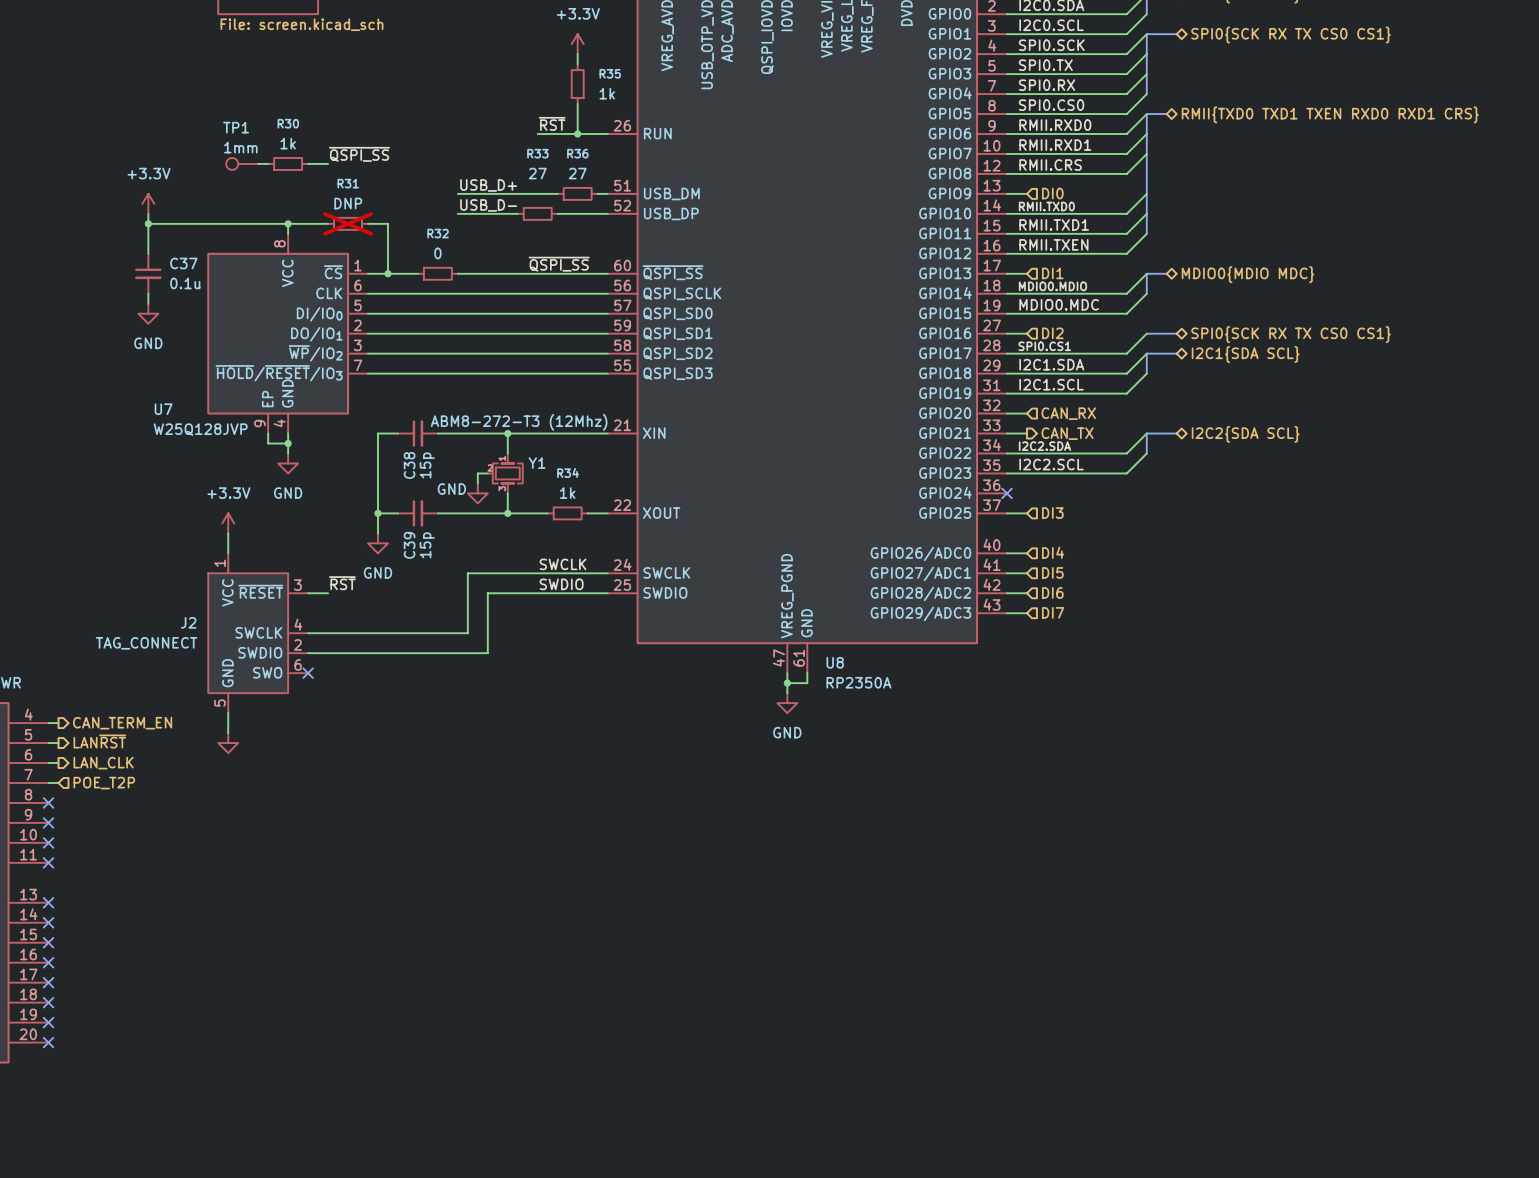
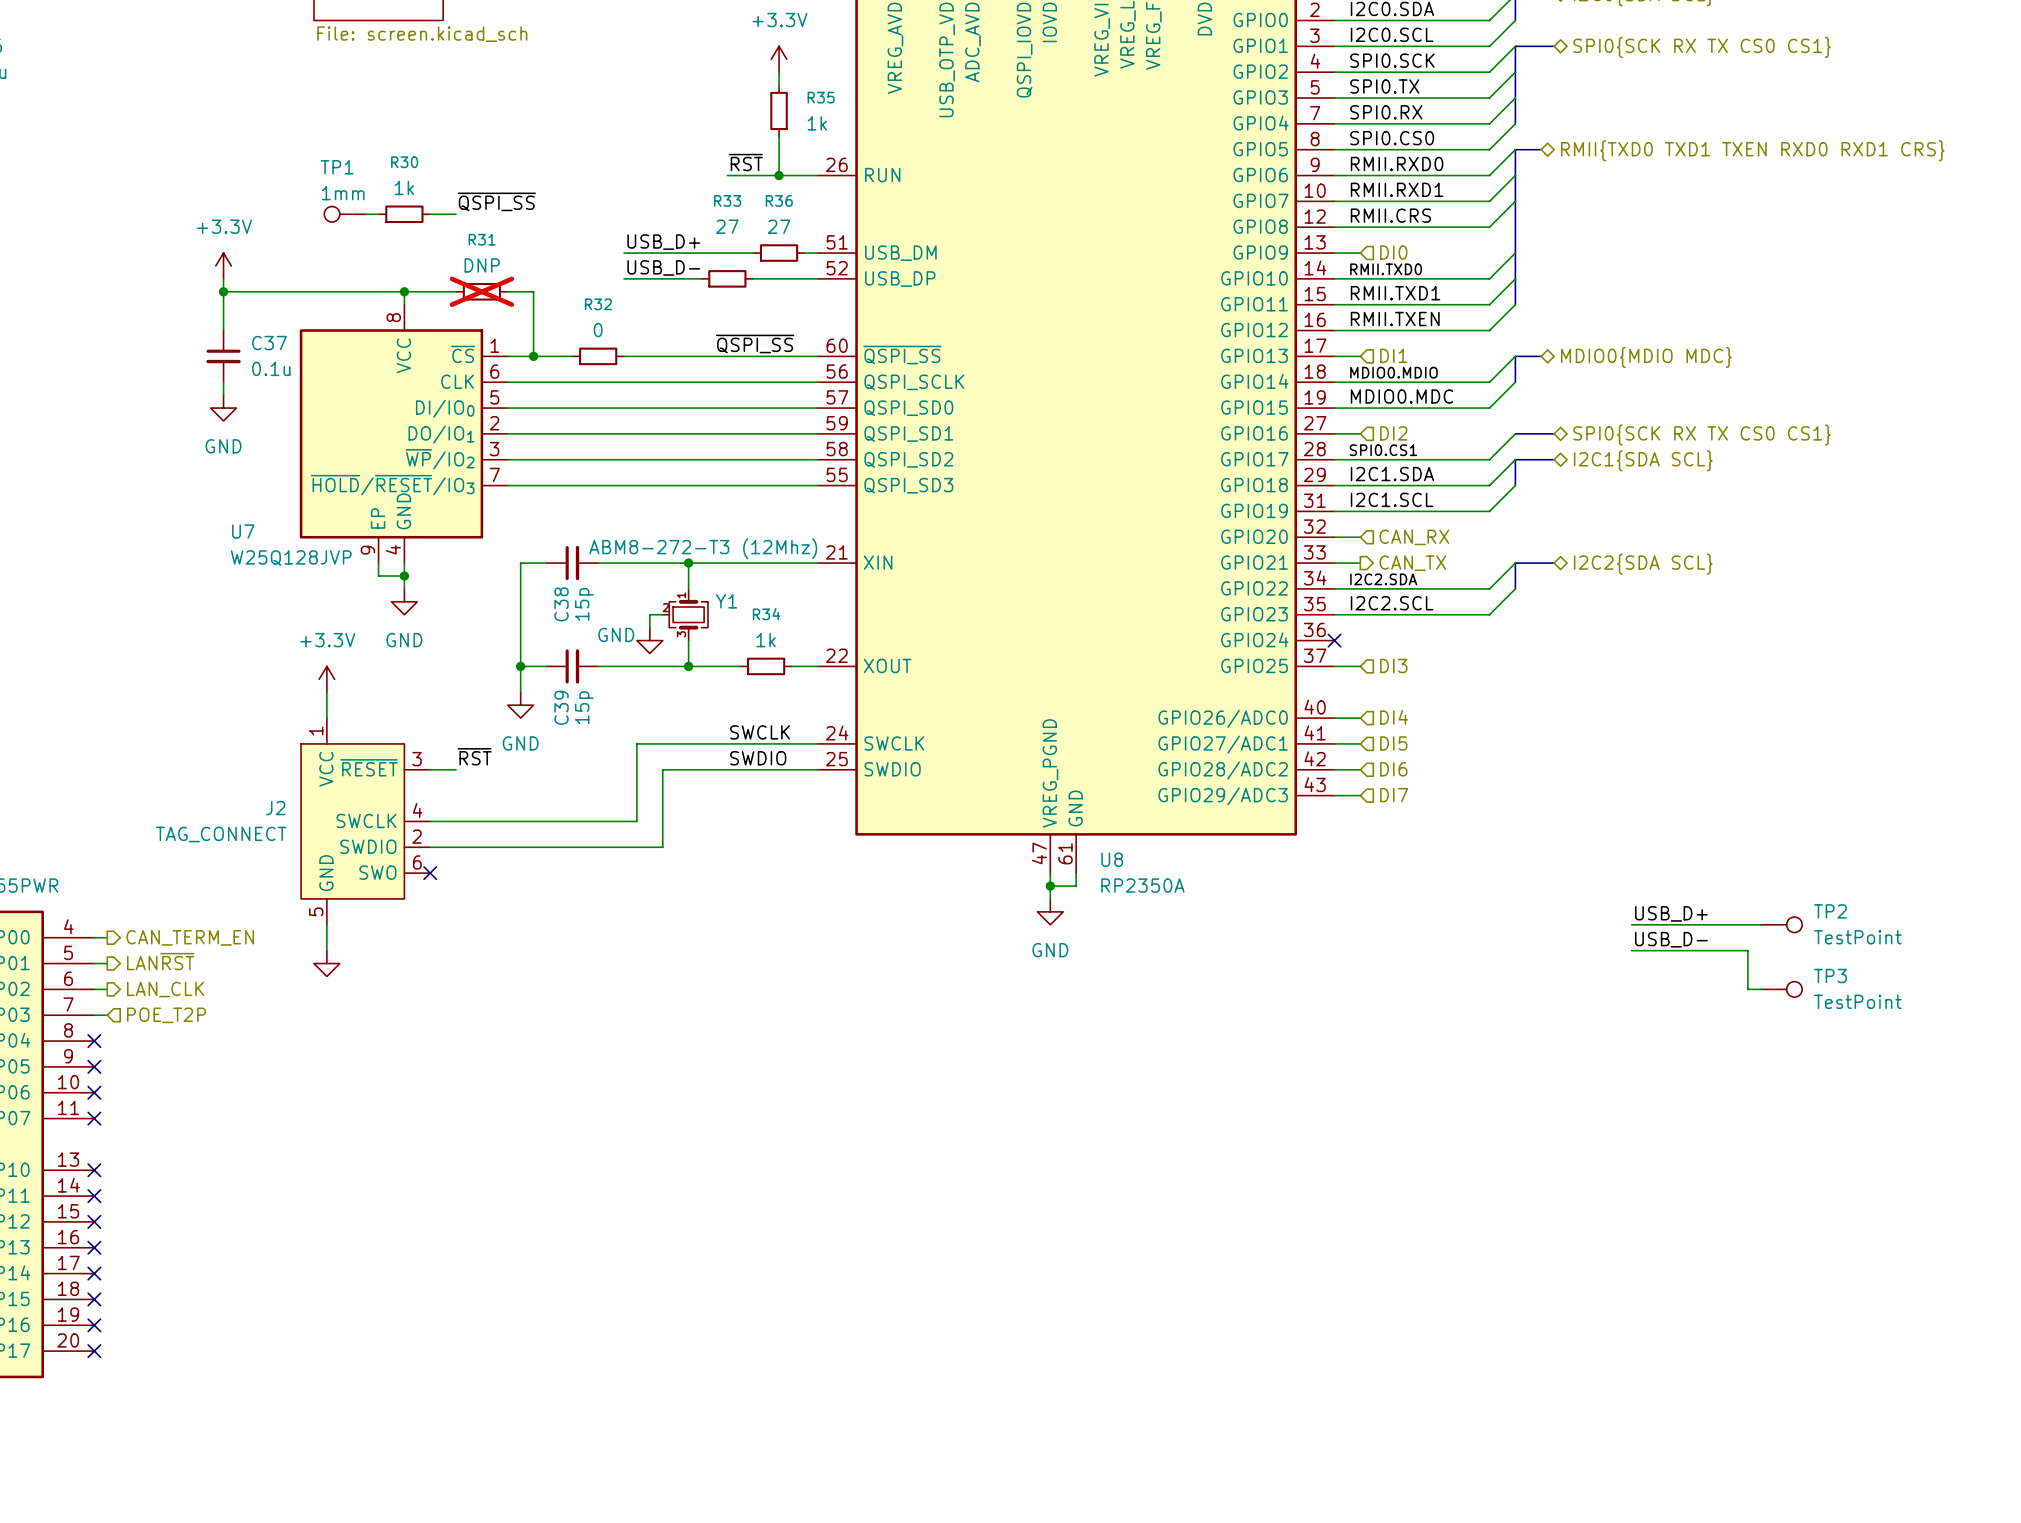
label: none -> USB_D+ (1671, 913)
wire: none -> (1631, 924) (1760, 924)
TP2: none -> TestPoint (1781, 924)
label: none -> USB_D- (1671, 939)
wire: none -> (1631, 950) (1747, 950) (1747, 989) (1760, 989)
TP3: none -> TestPoint (1781, 989)

